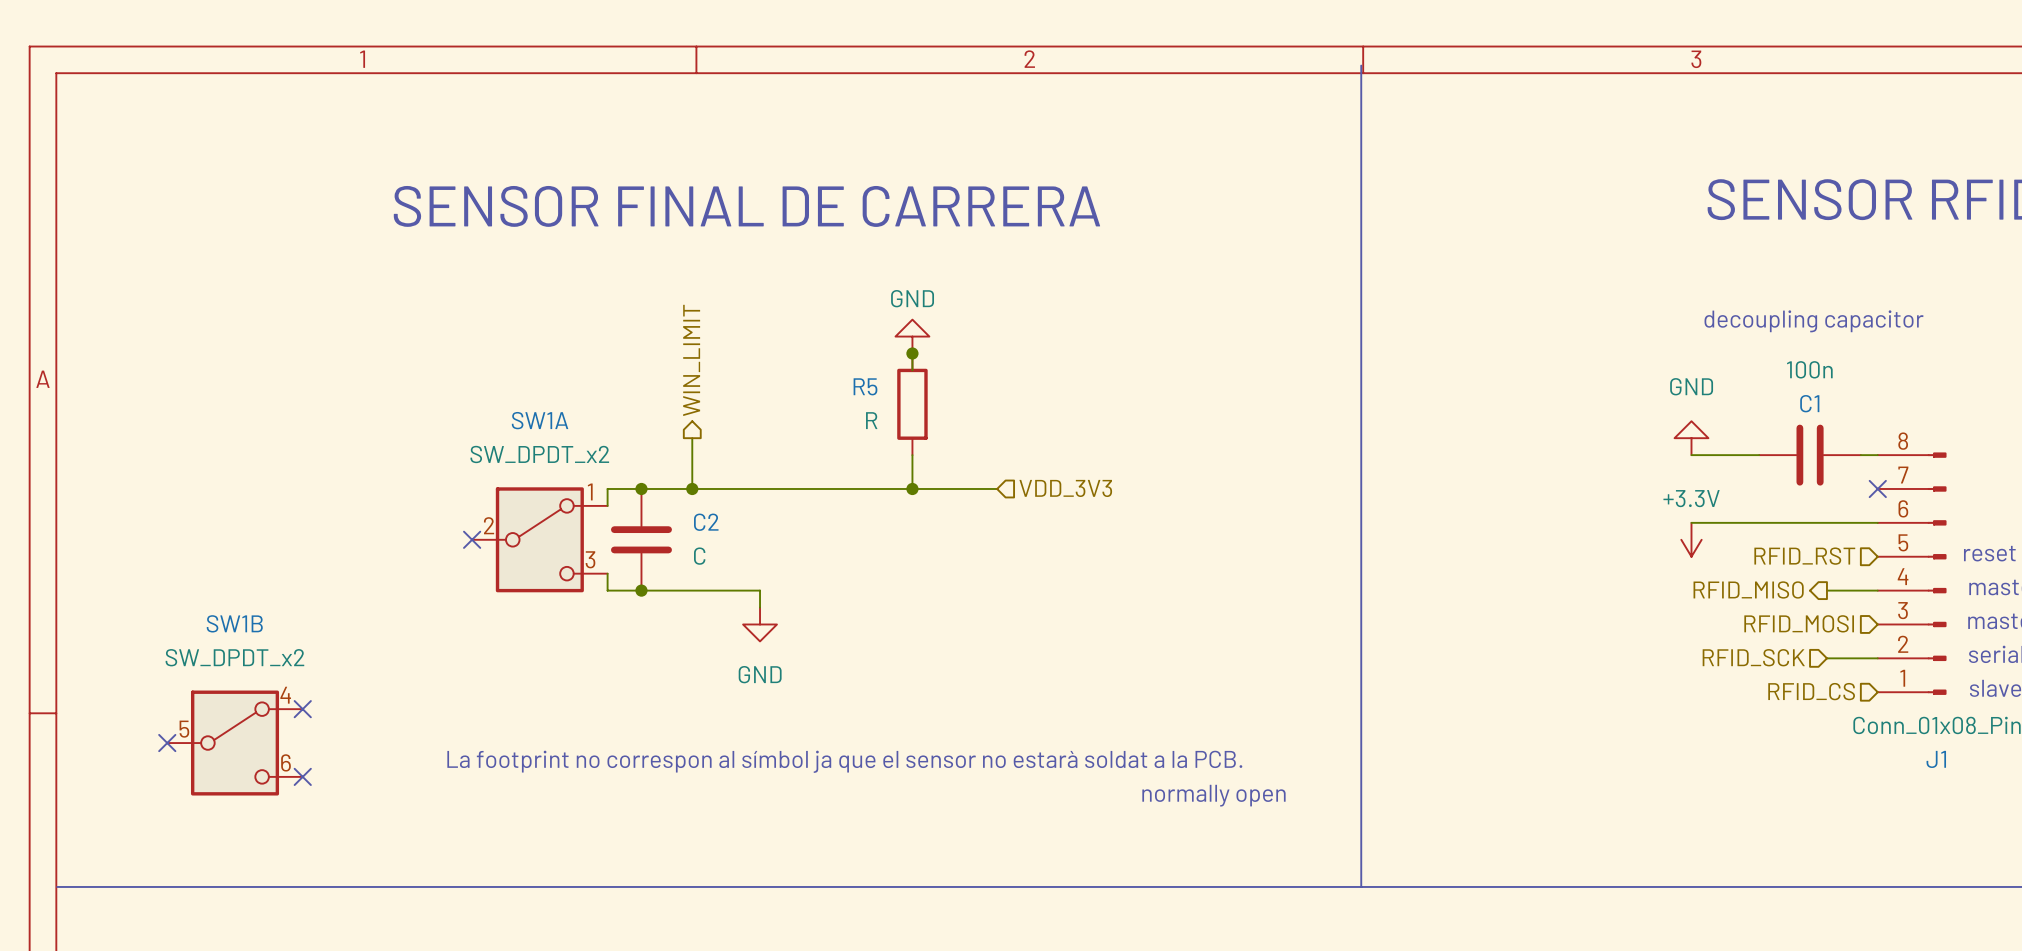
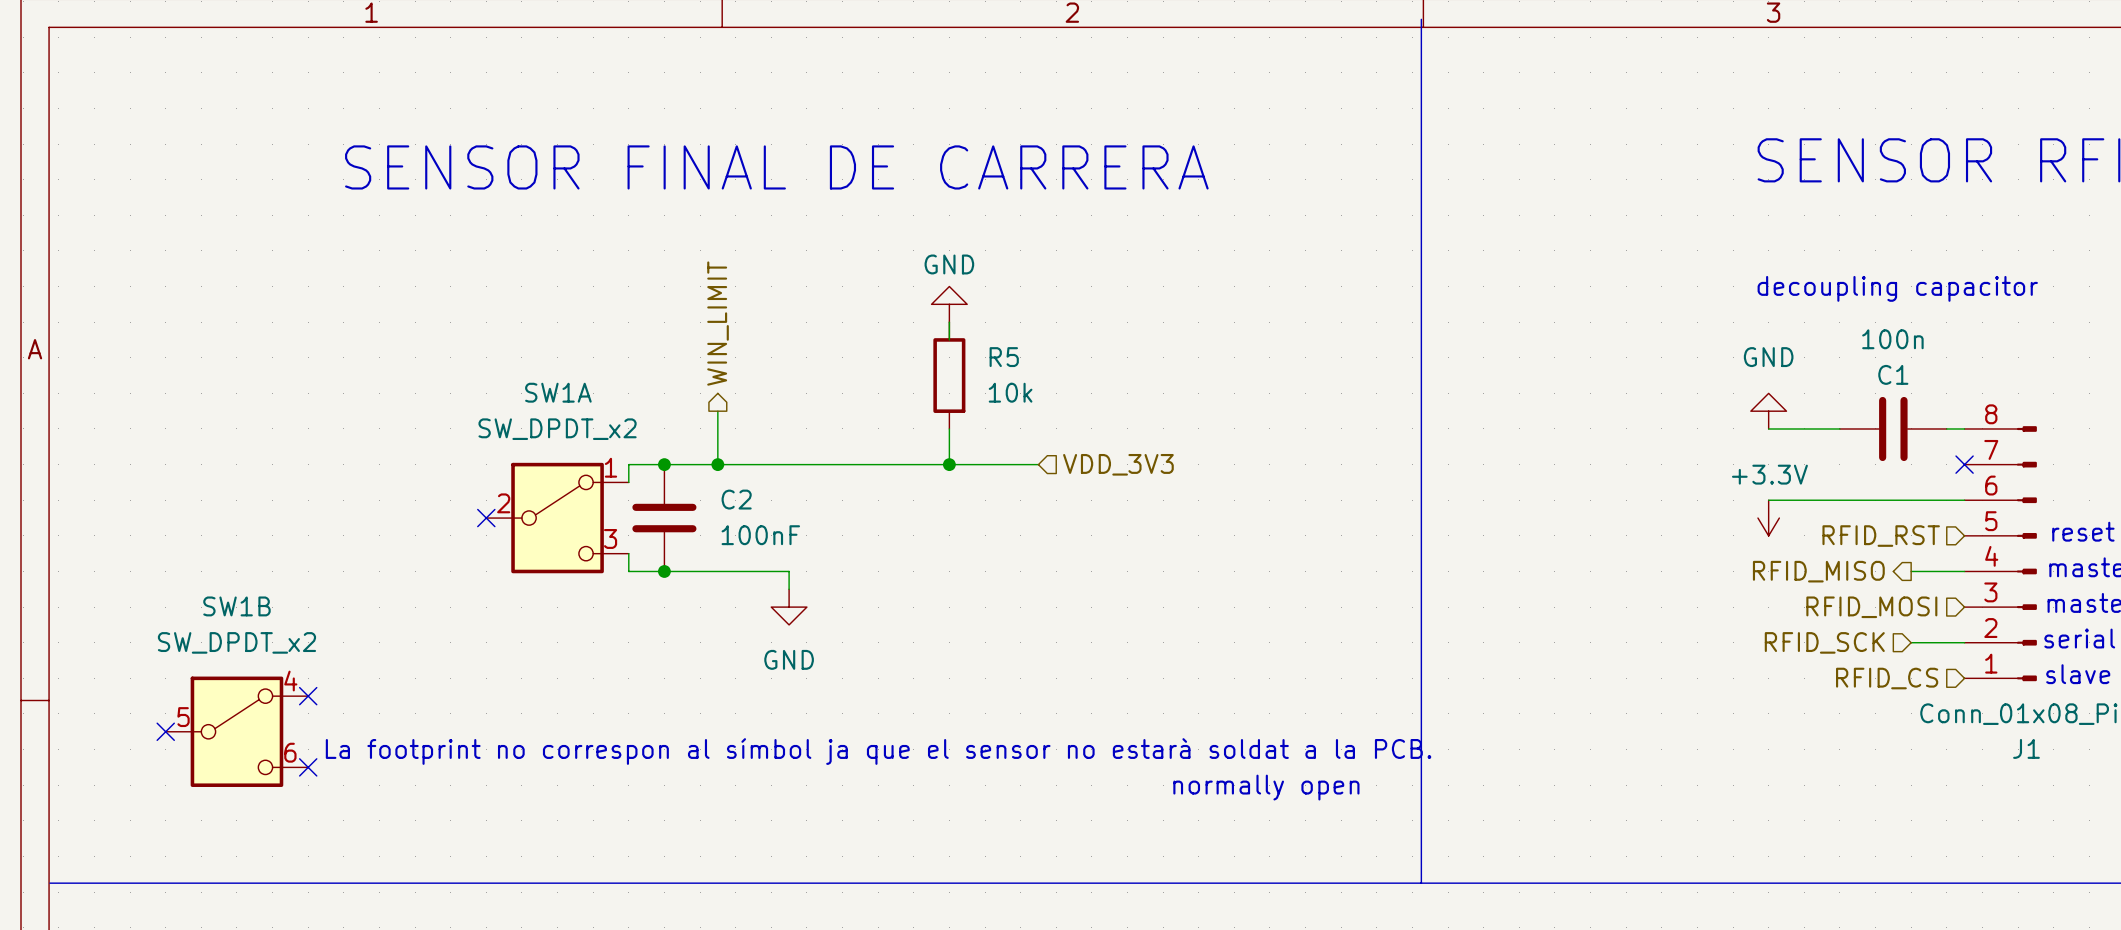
junction: (912, 353) -> none
R5 name position: R5 (865, 386) -> R5 (1004, 357)
R5 value: R (871, 420) -> 10k (1010, 392)
C2 value: C (699, 556) -> 100nF (760, 535)

